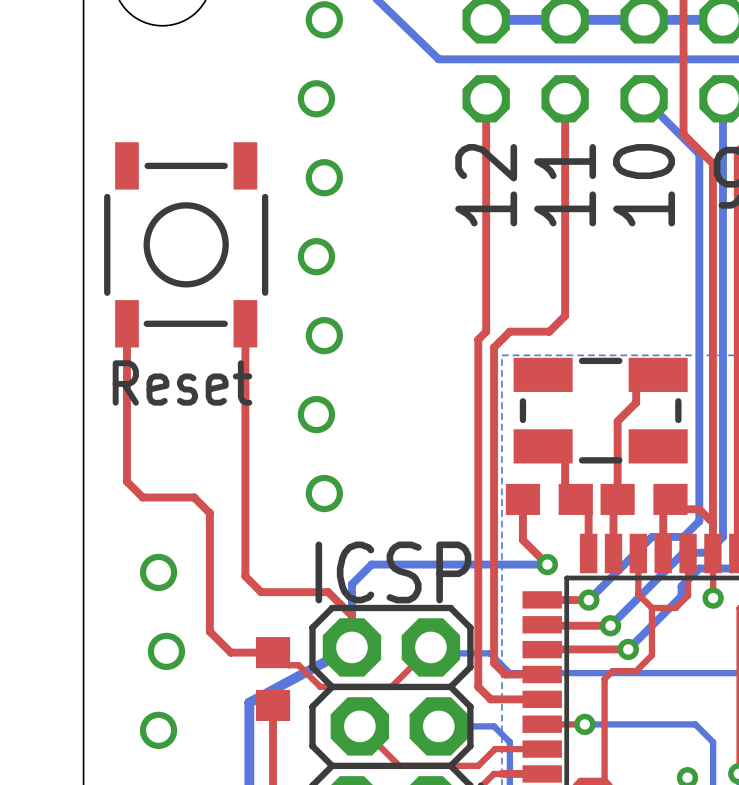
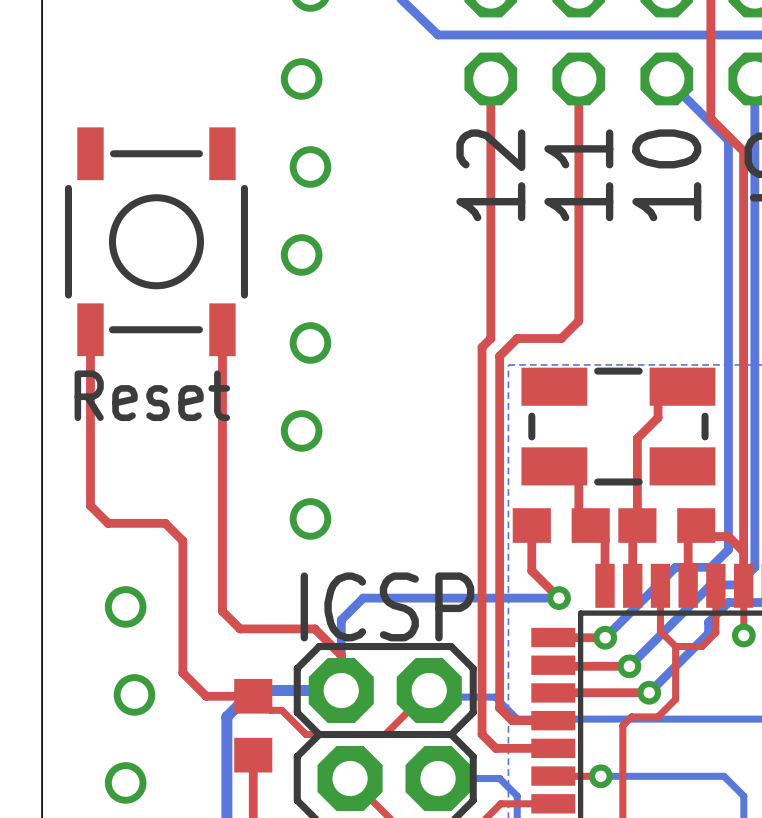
bottom track: (351, 647) (249, 702) -> (341, 690) (253, 690) (226, 716) (226, 752)

